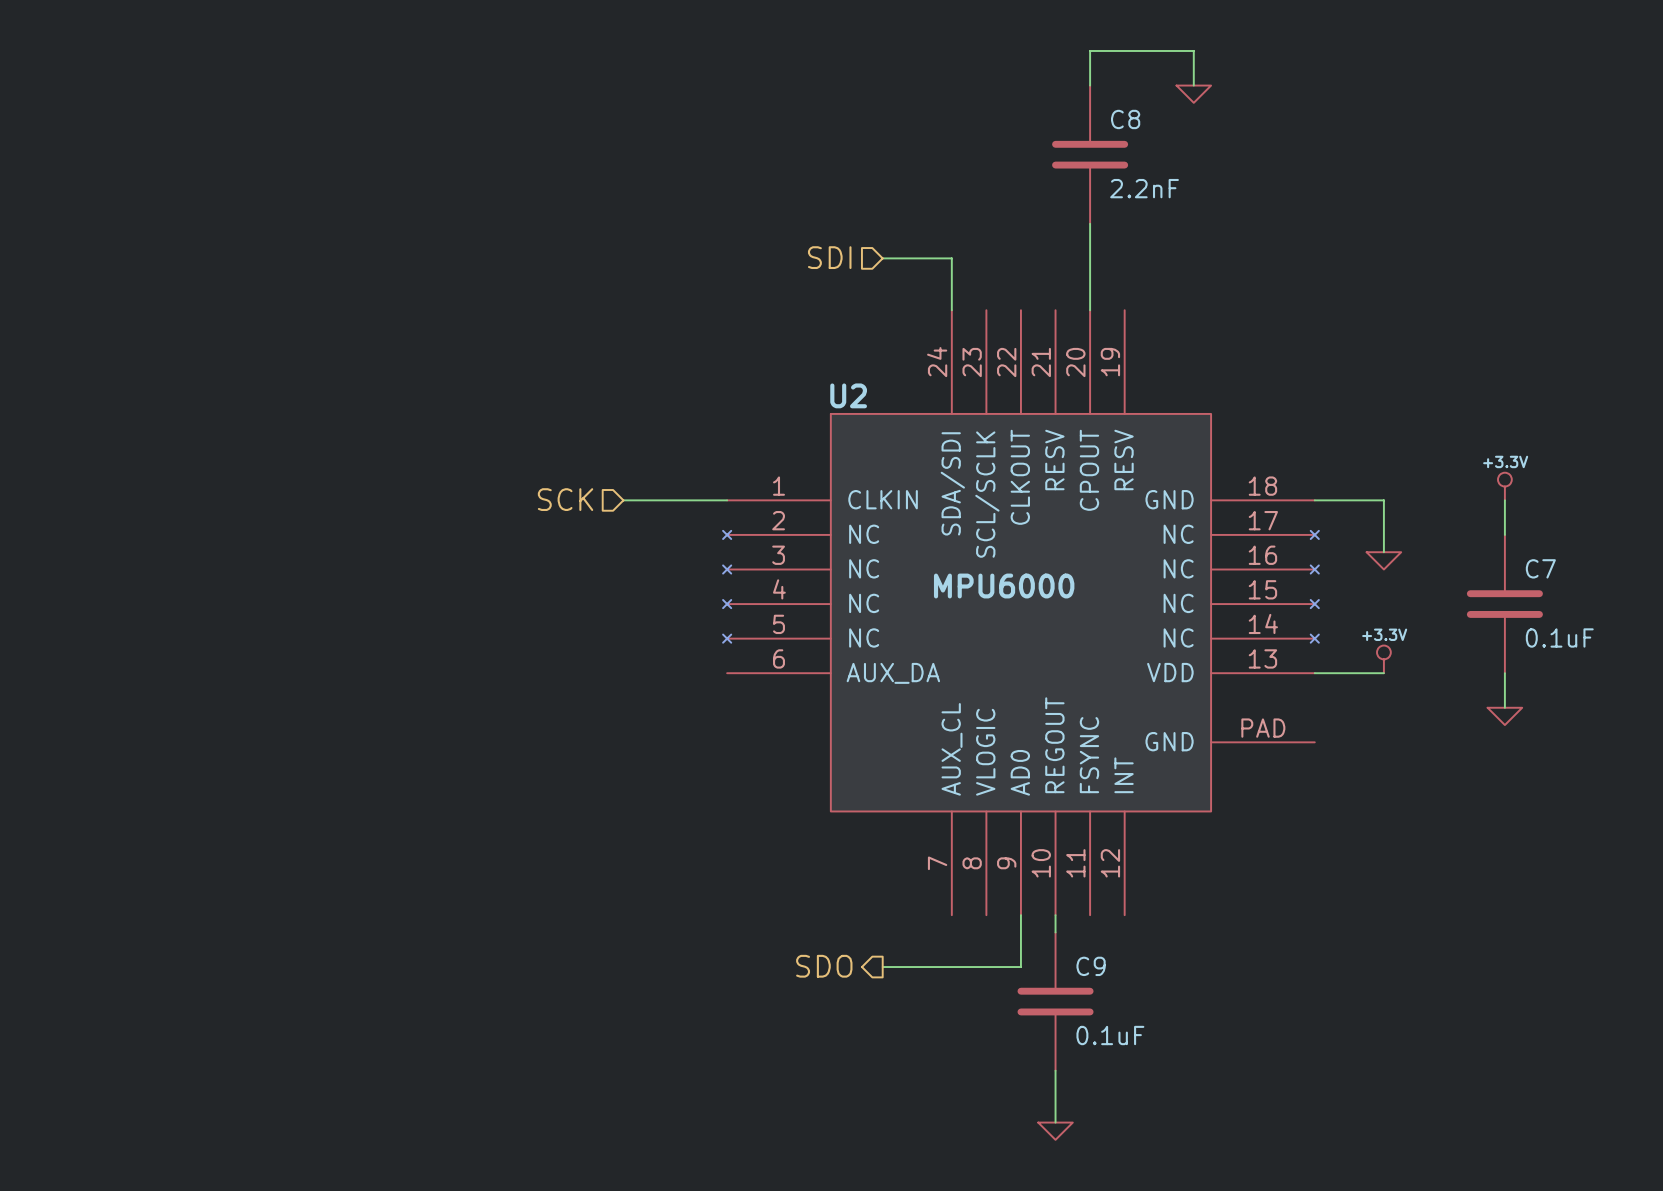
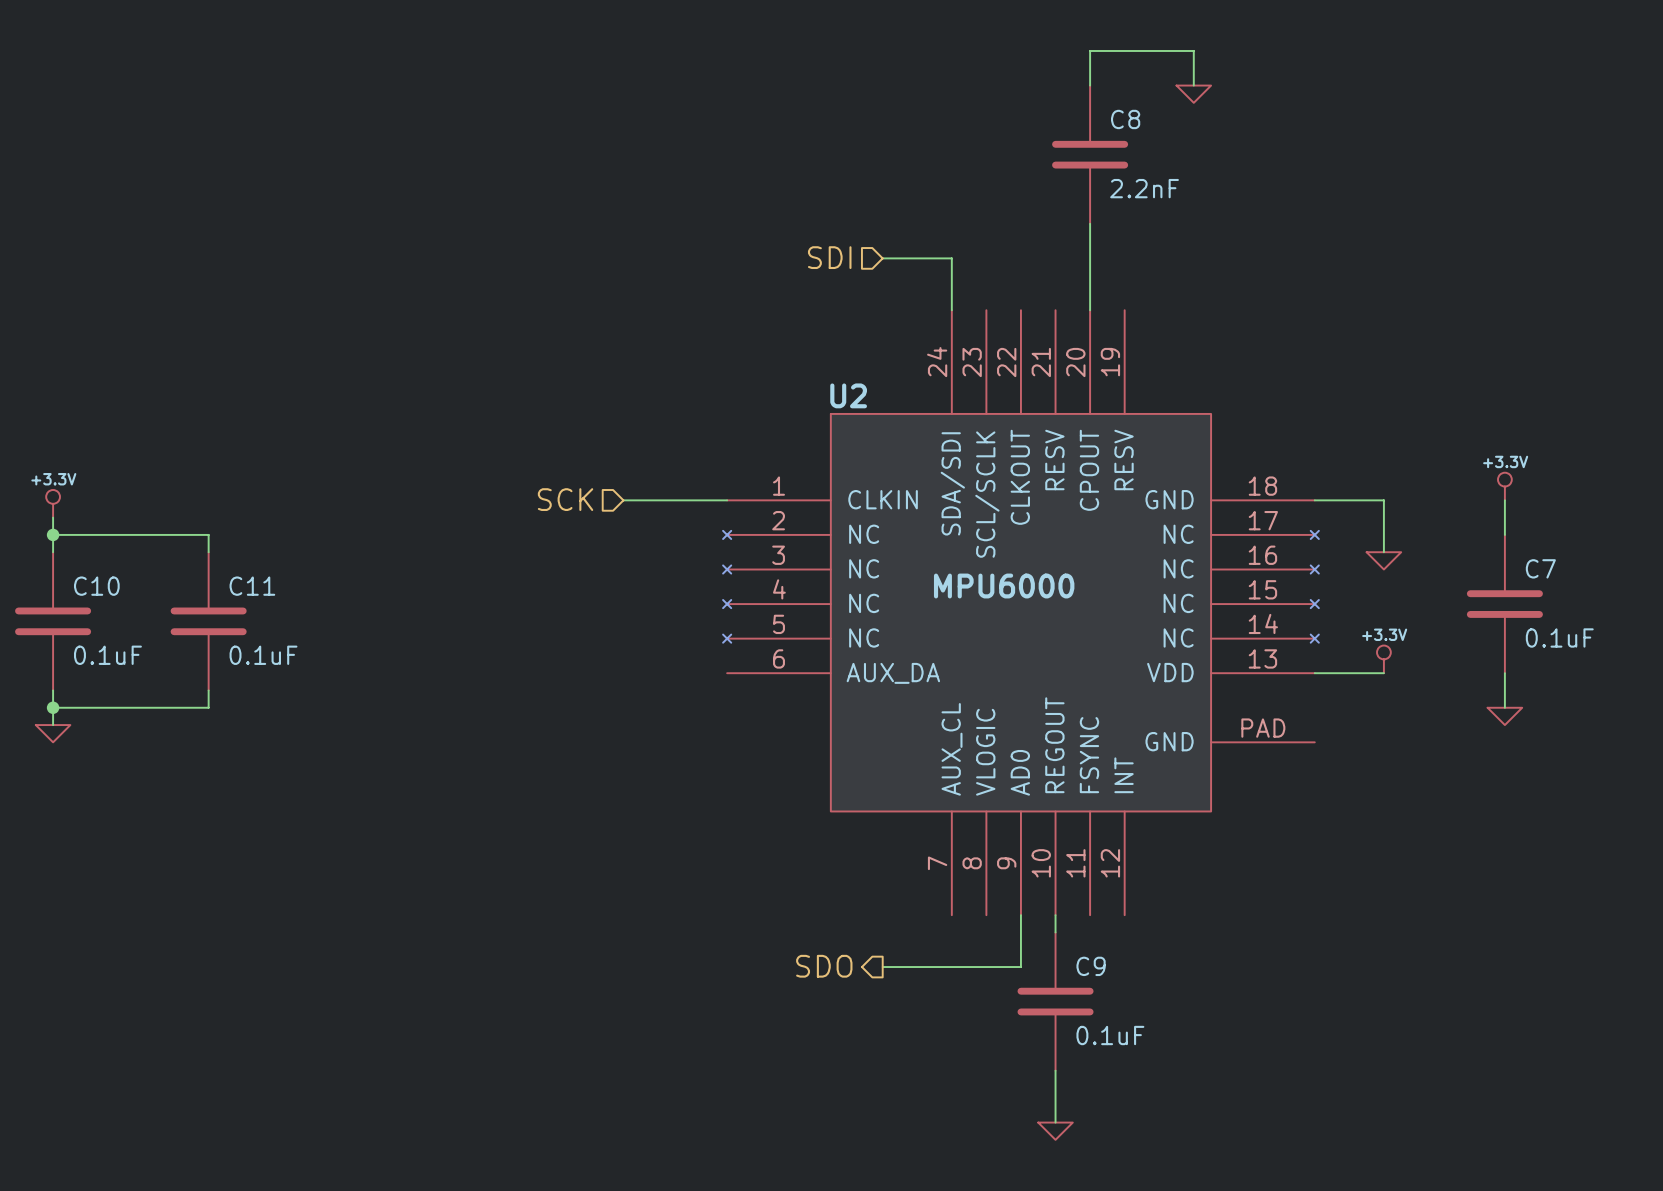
power symbol: none -> +3.3V (53, 503)
wire: none -> (53, 517) (53, 552)
wire: none -> (53, 534) (208, 534) (208, 552)
junction: none -> (53, 534)
C10: none -> 0.1uF (53, 621)
C11: none -> 0.1uF (208, 621)
wire: none -> (53, 690) (53, 725)
wire: none -> (208, 690) (208, 707) (53, 707)
junction: none -> (53, 707)
power symbol: none -> (53, 733)

